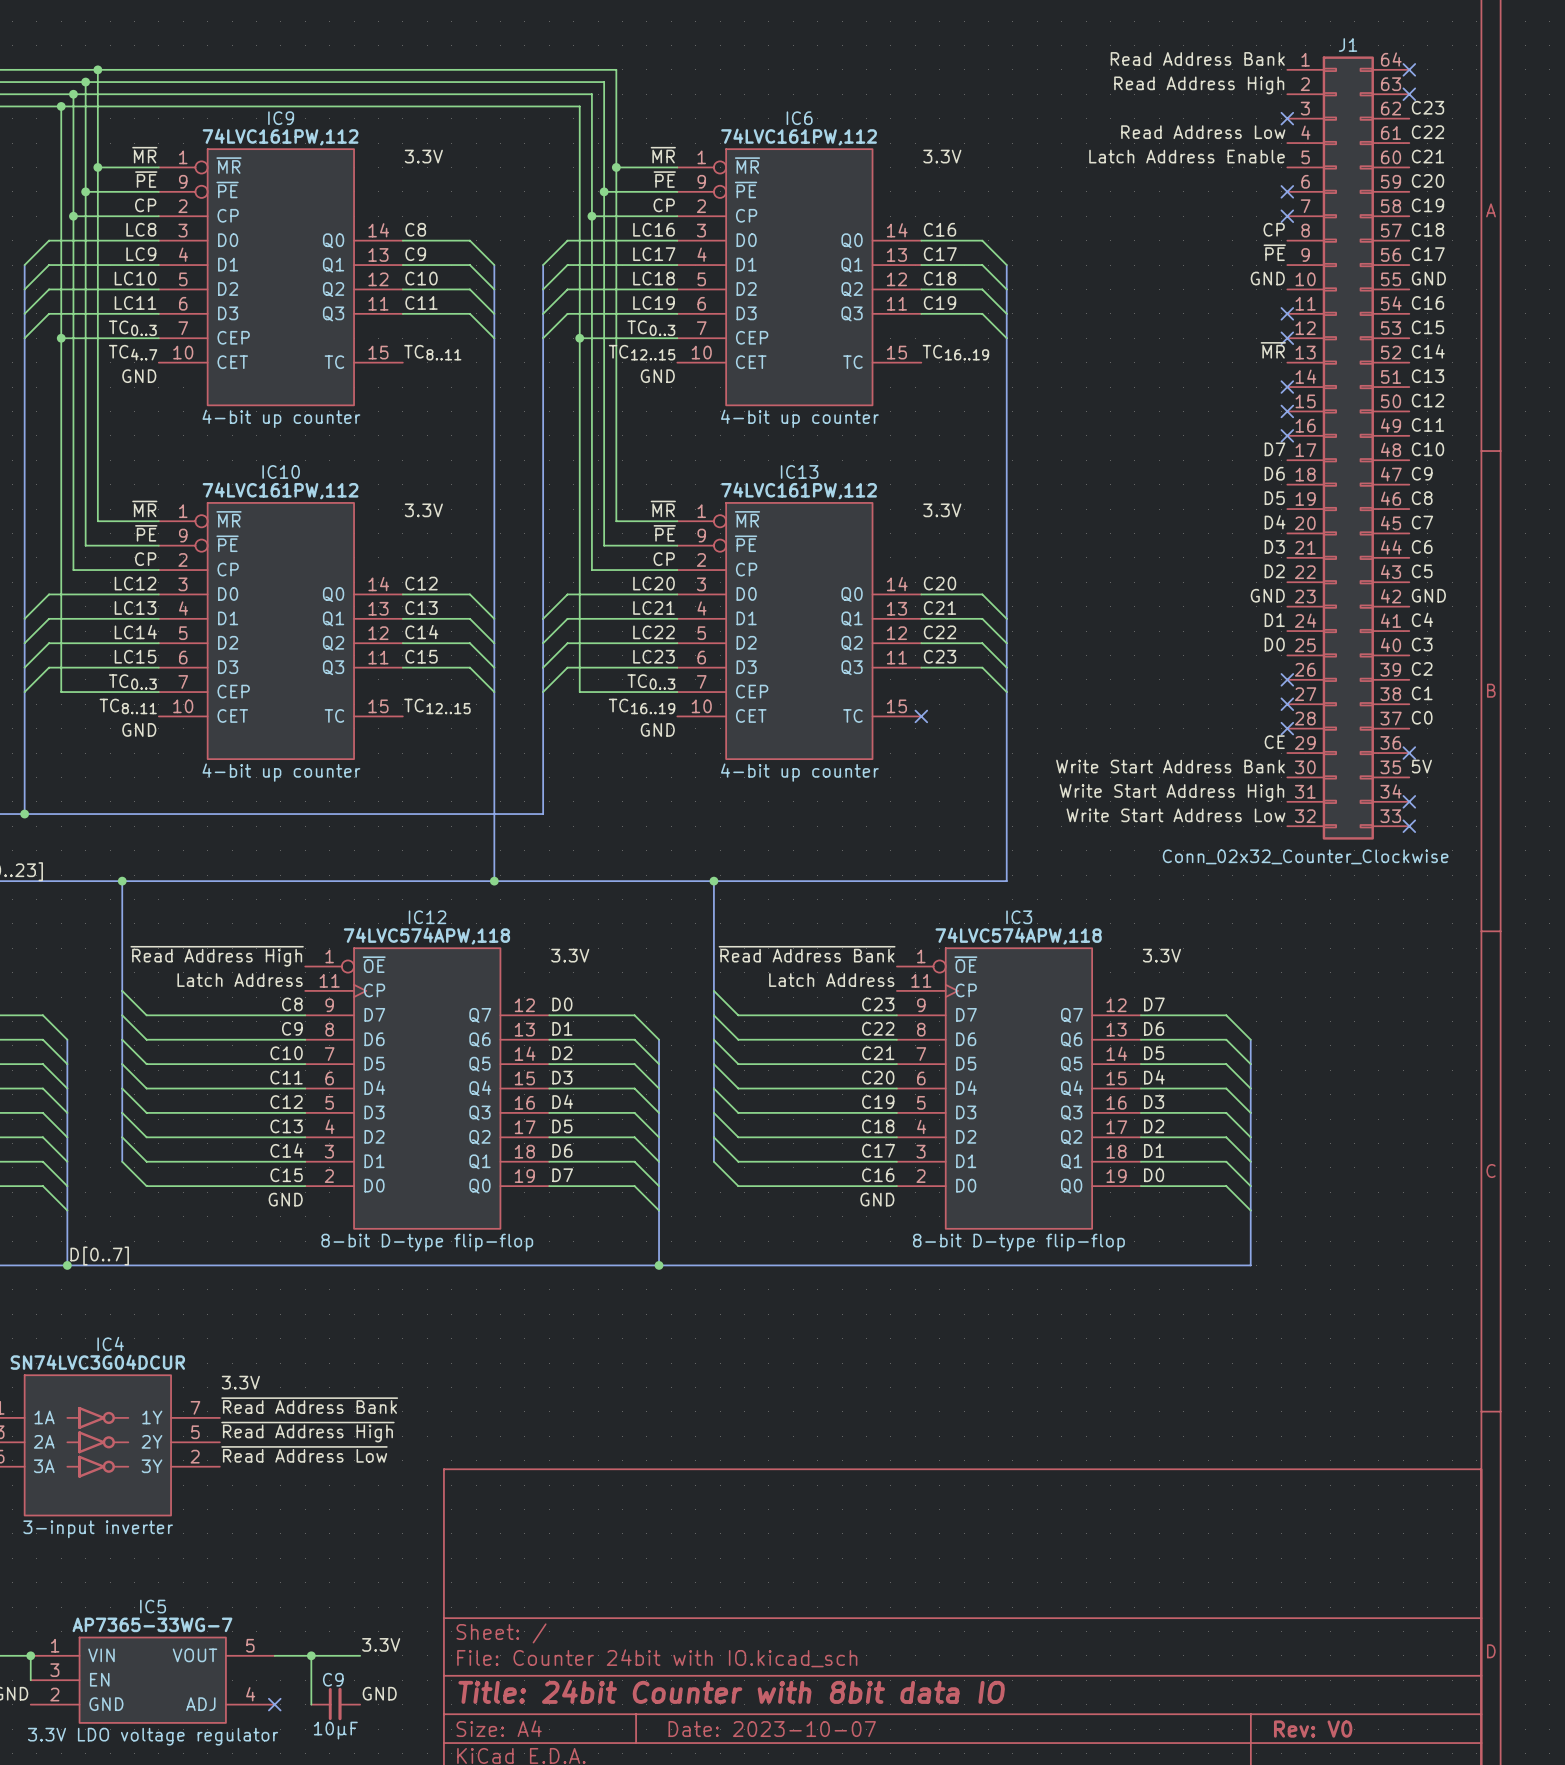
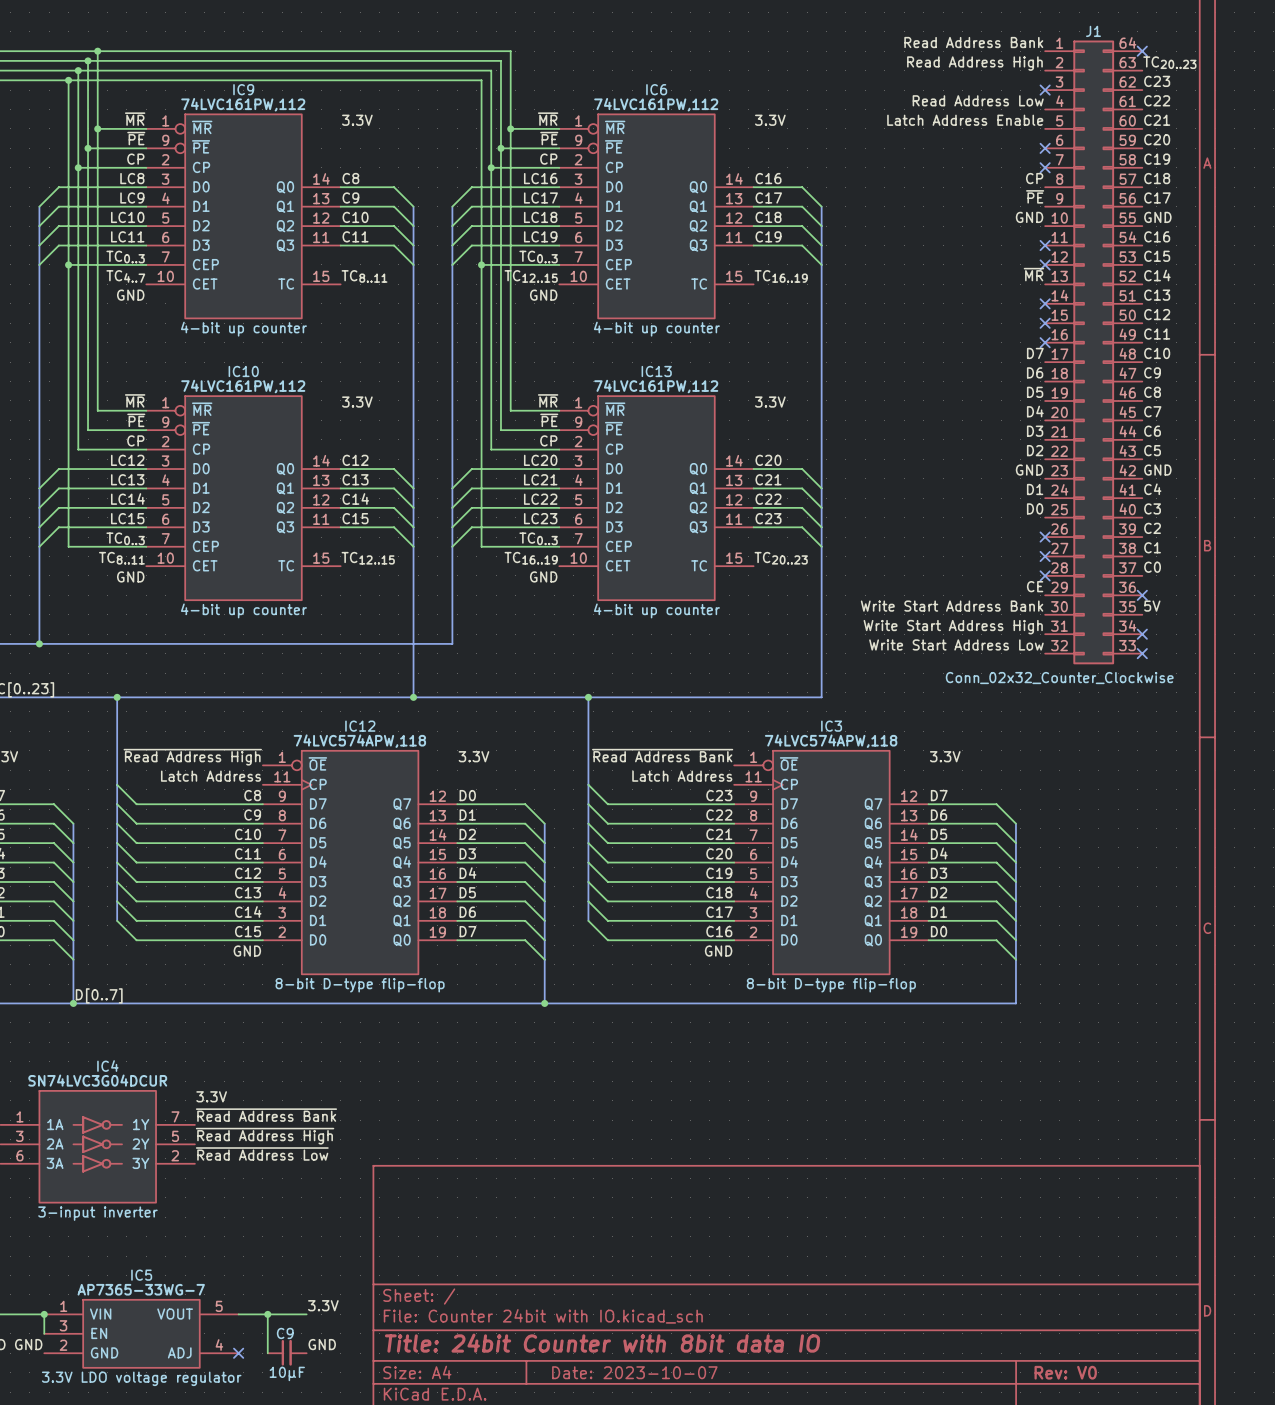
label: none -> TC20..23 (1169, 62)
no-connect mark: (1409, 94) -> none
label: none -> TC20..23 (781, 558)
no-connect mark: (921, 716) -> none

